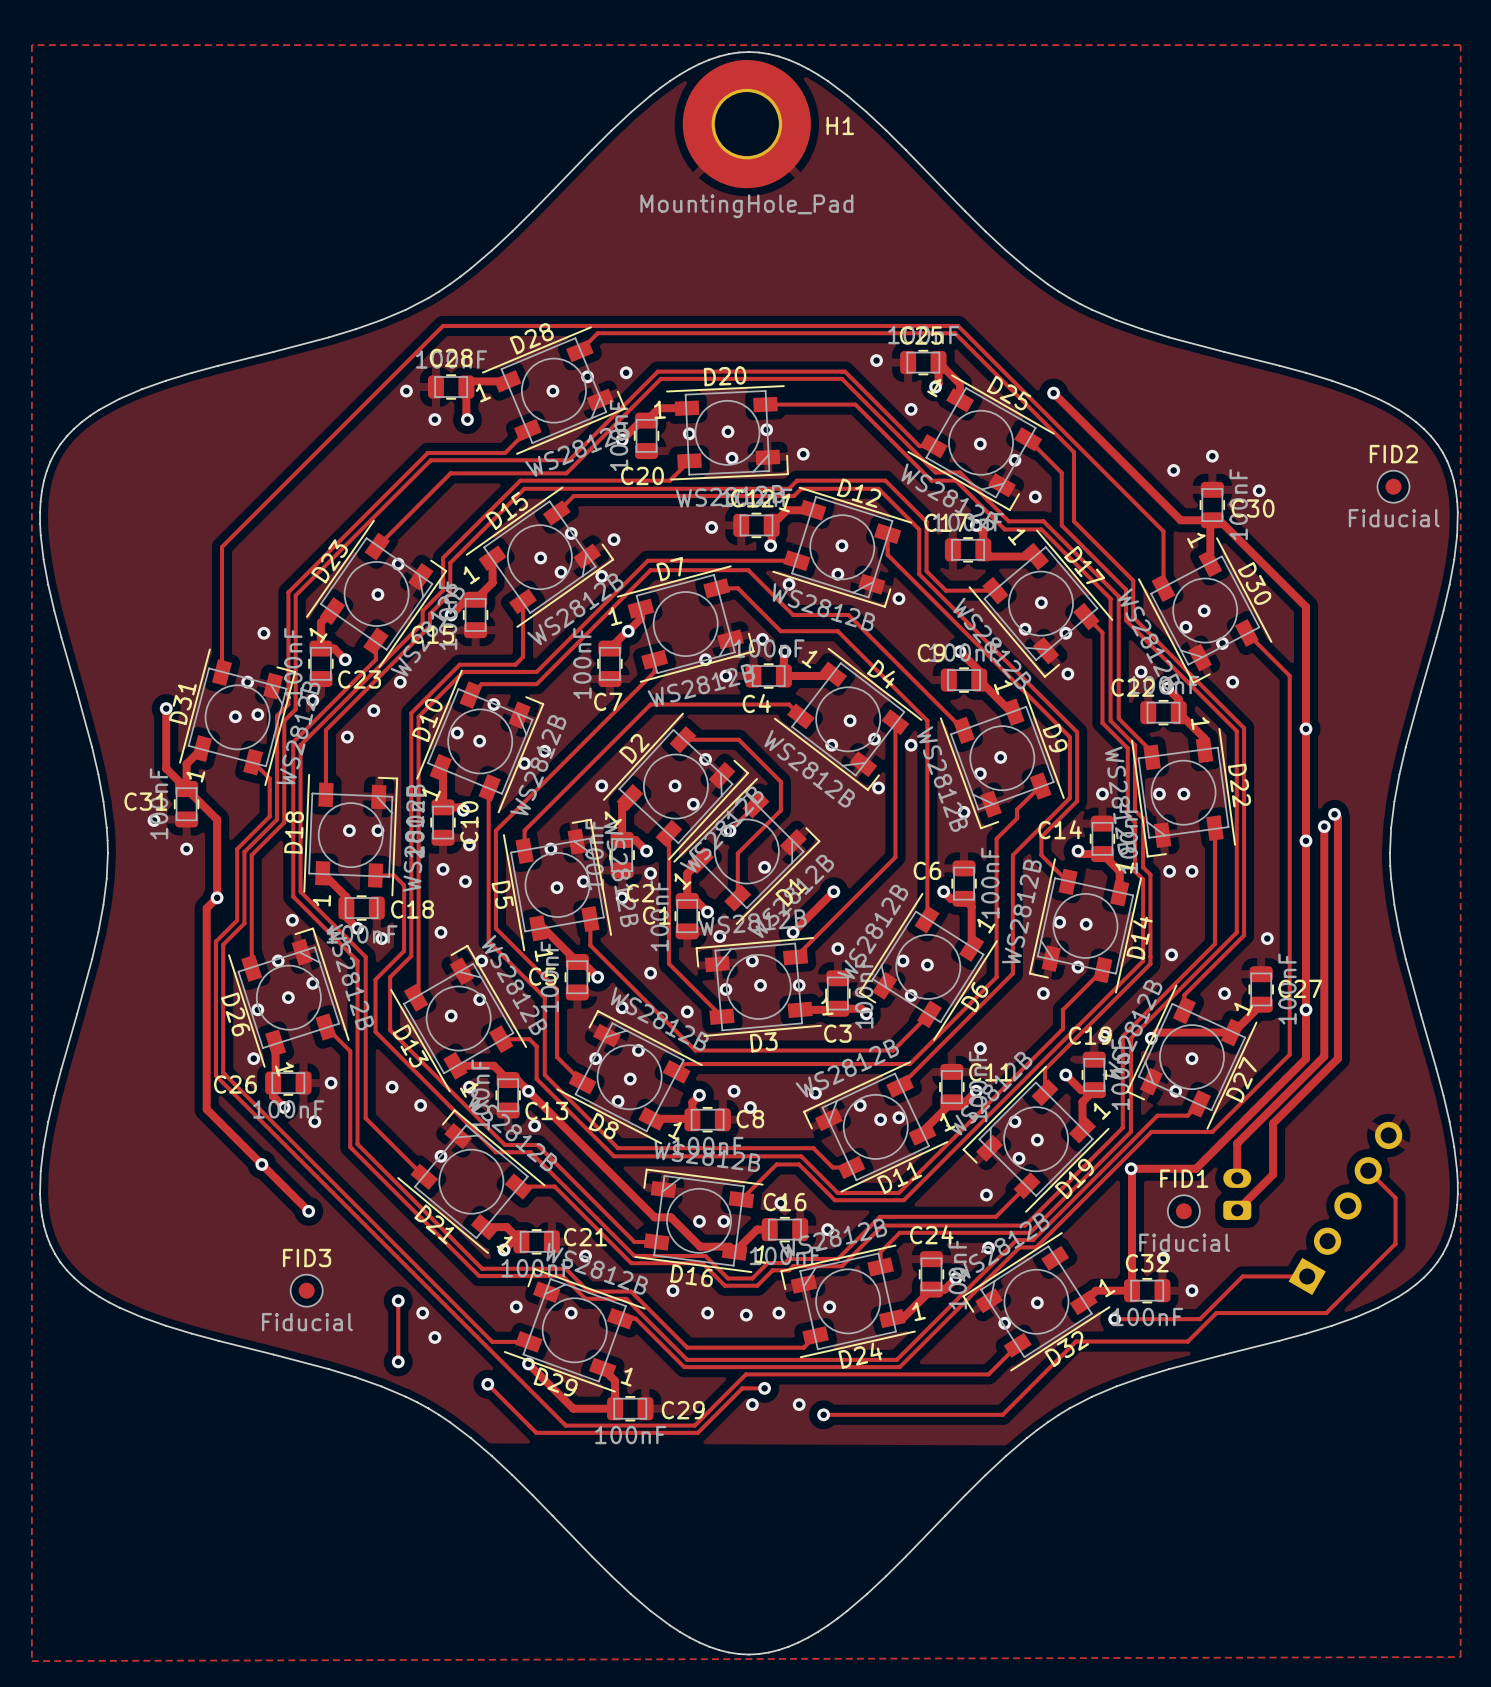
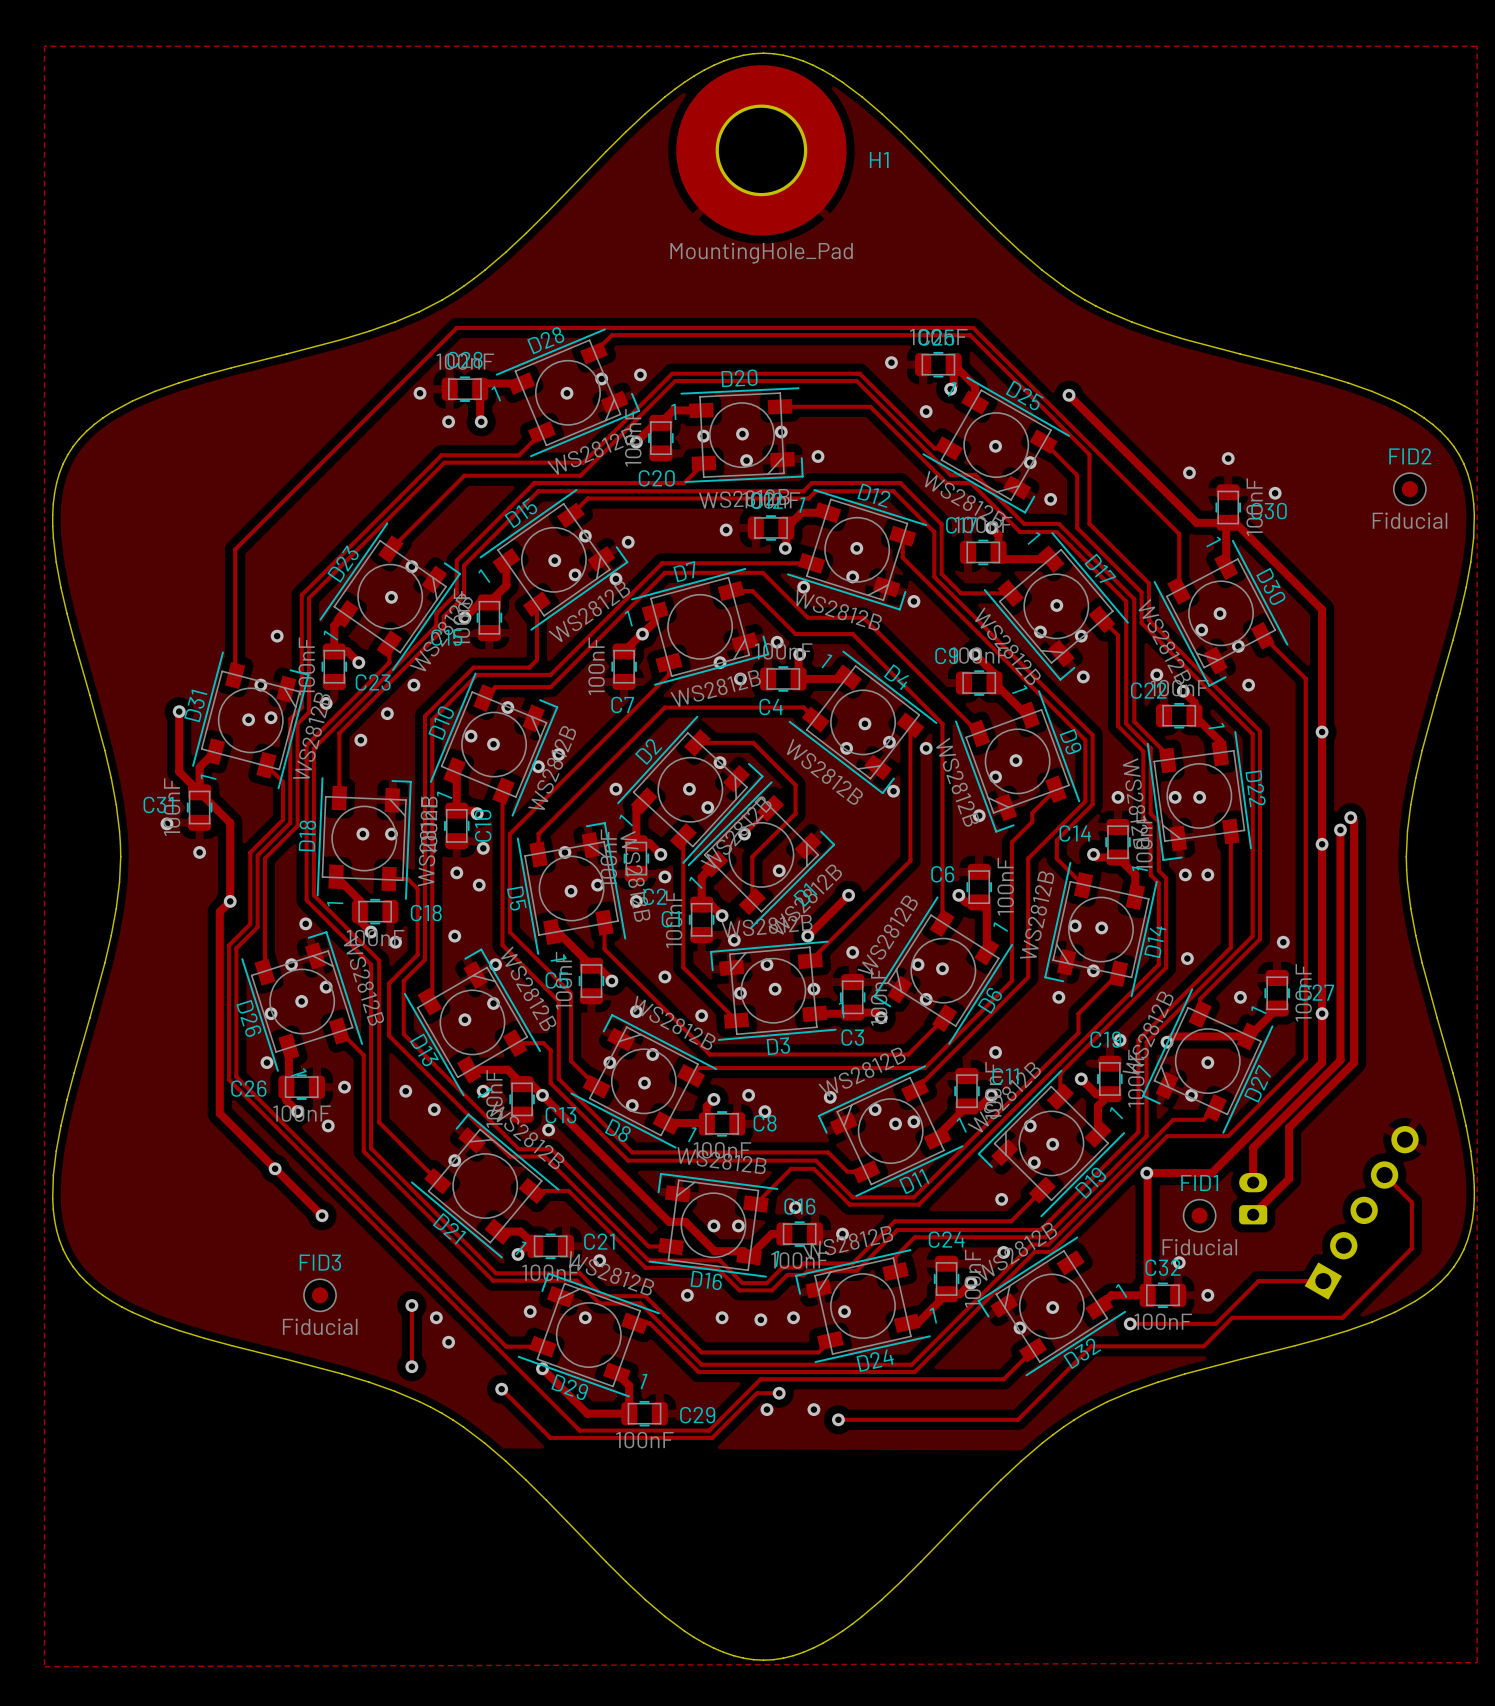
H1 footprint: [682, 59, 811, 189] -> [676, 65, 847, 236]

